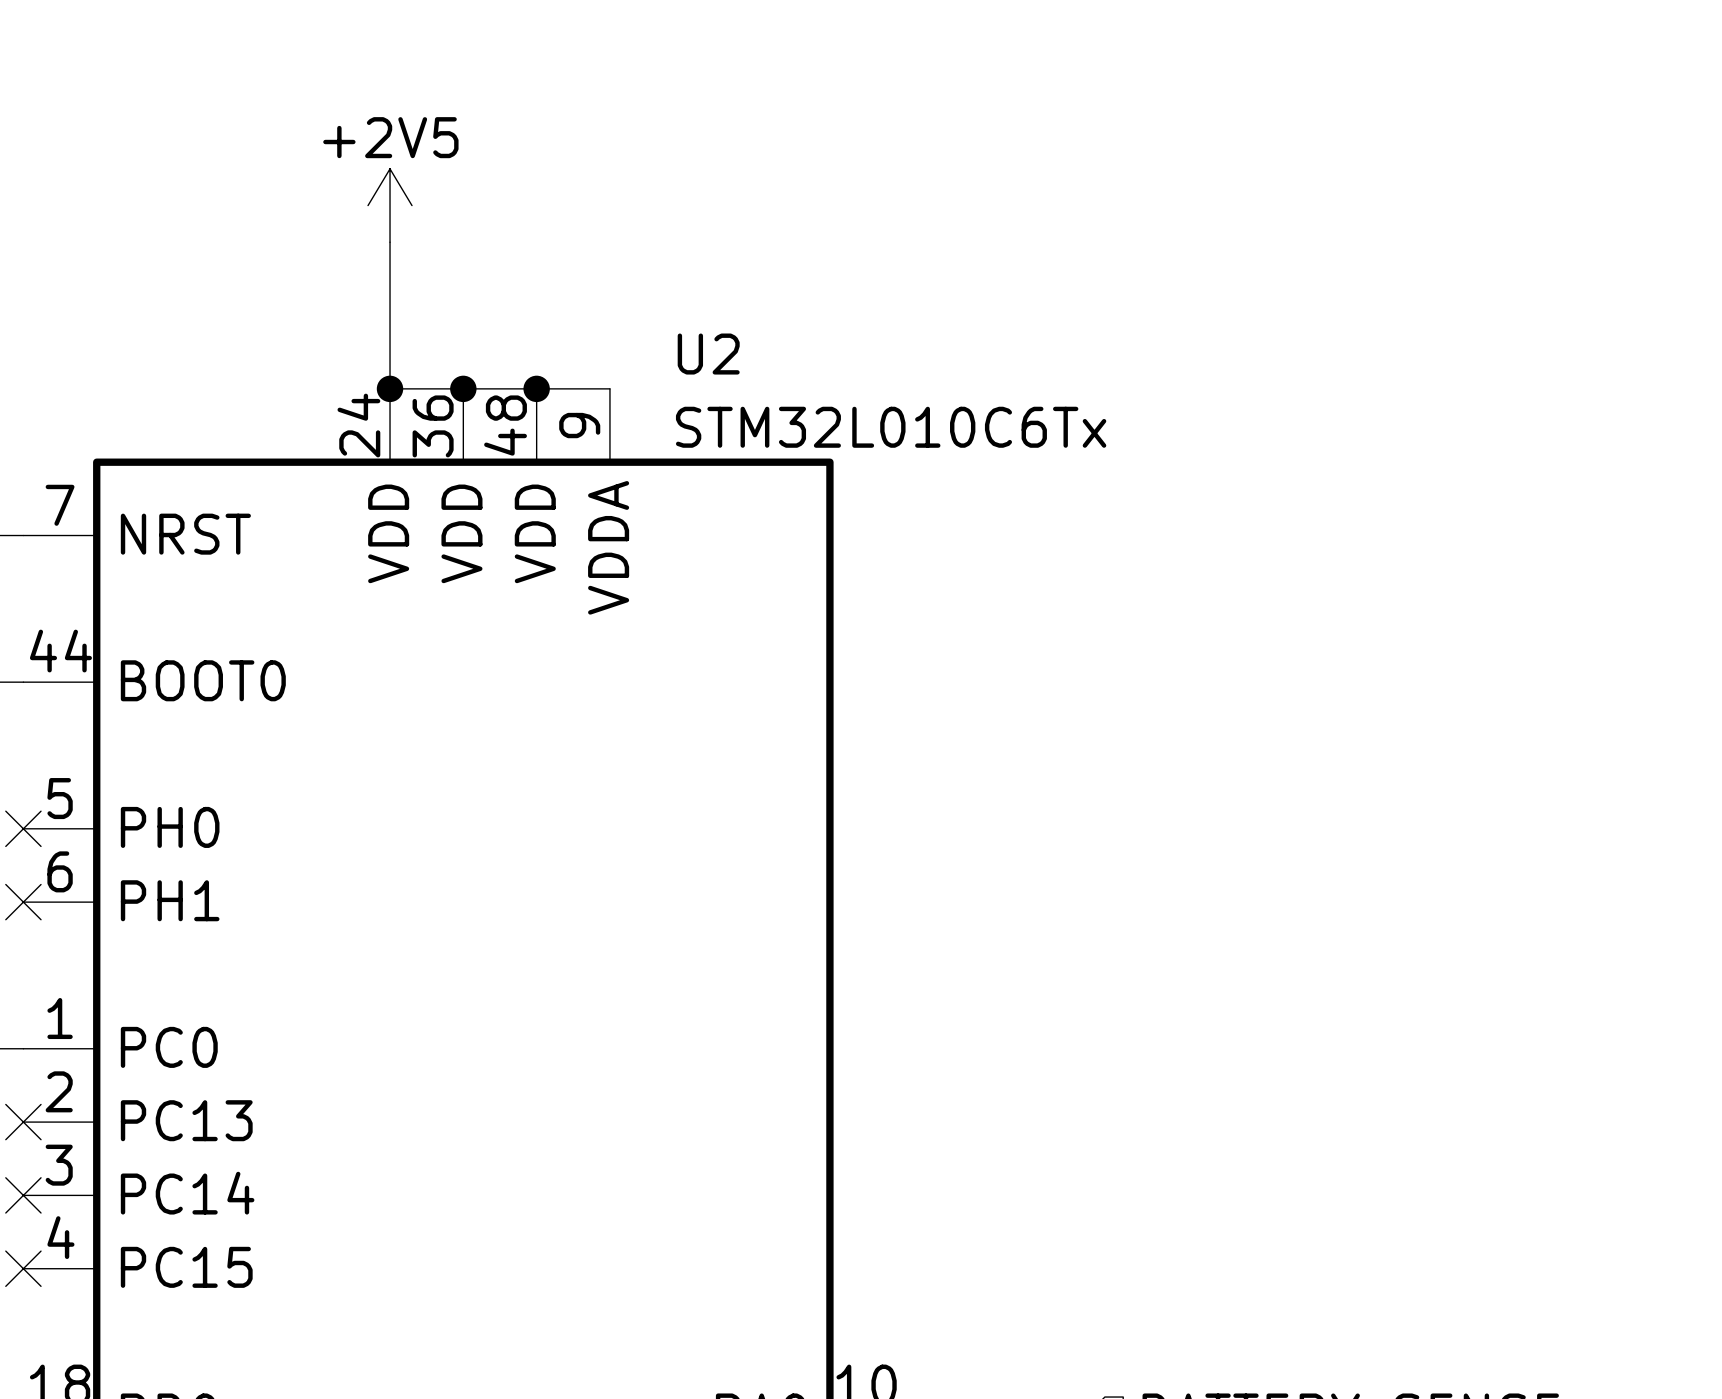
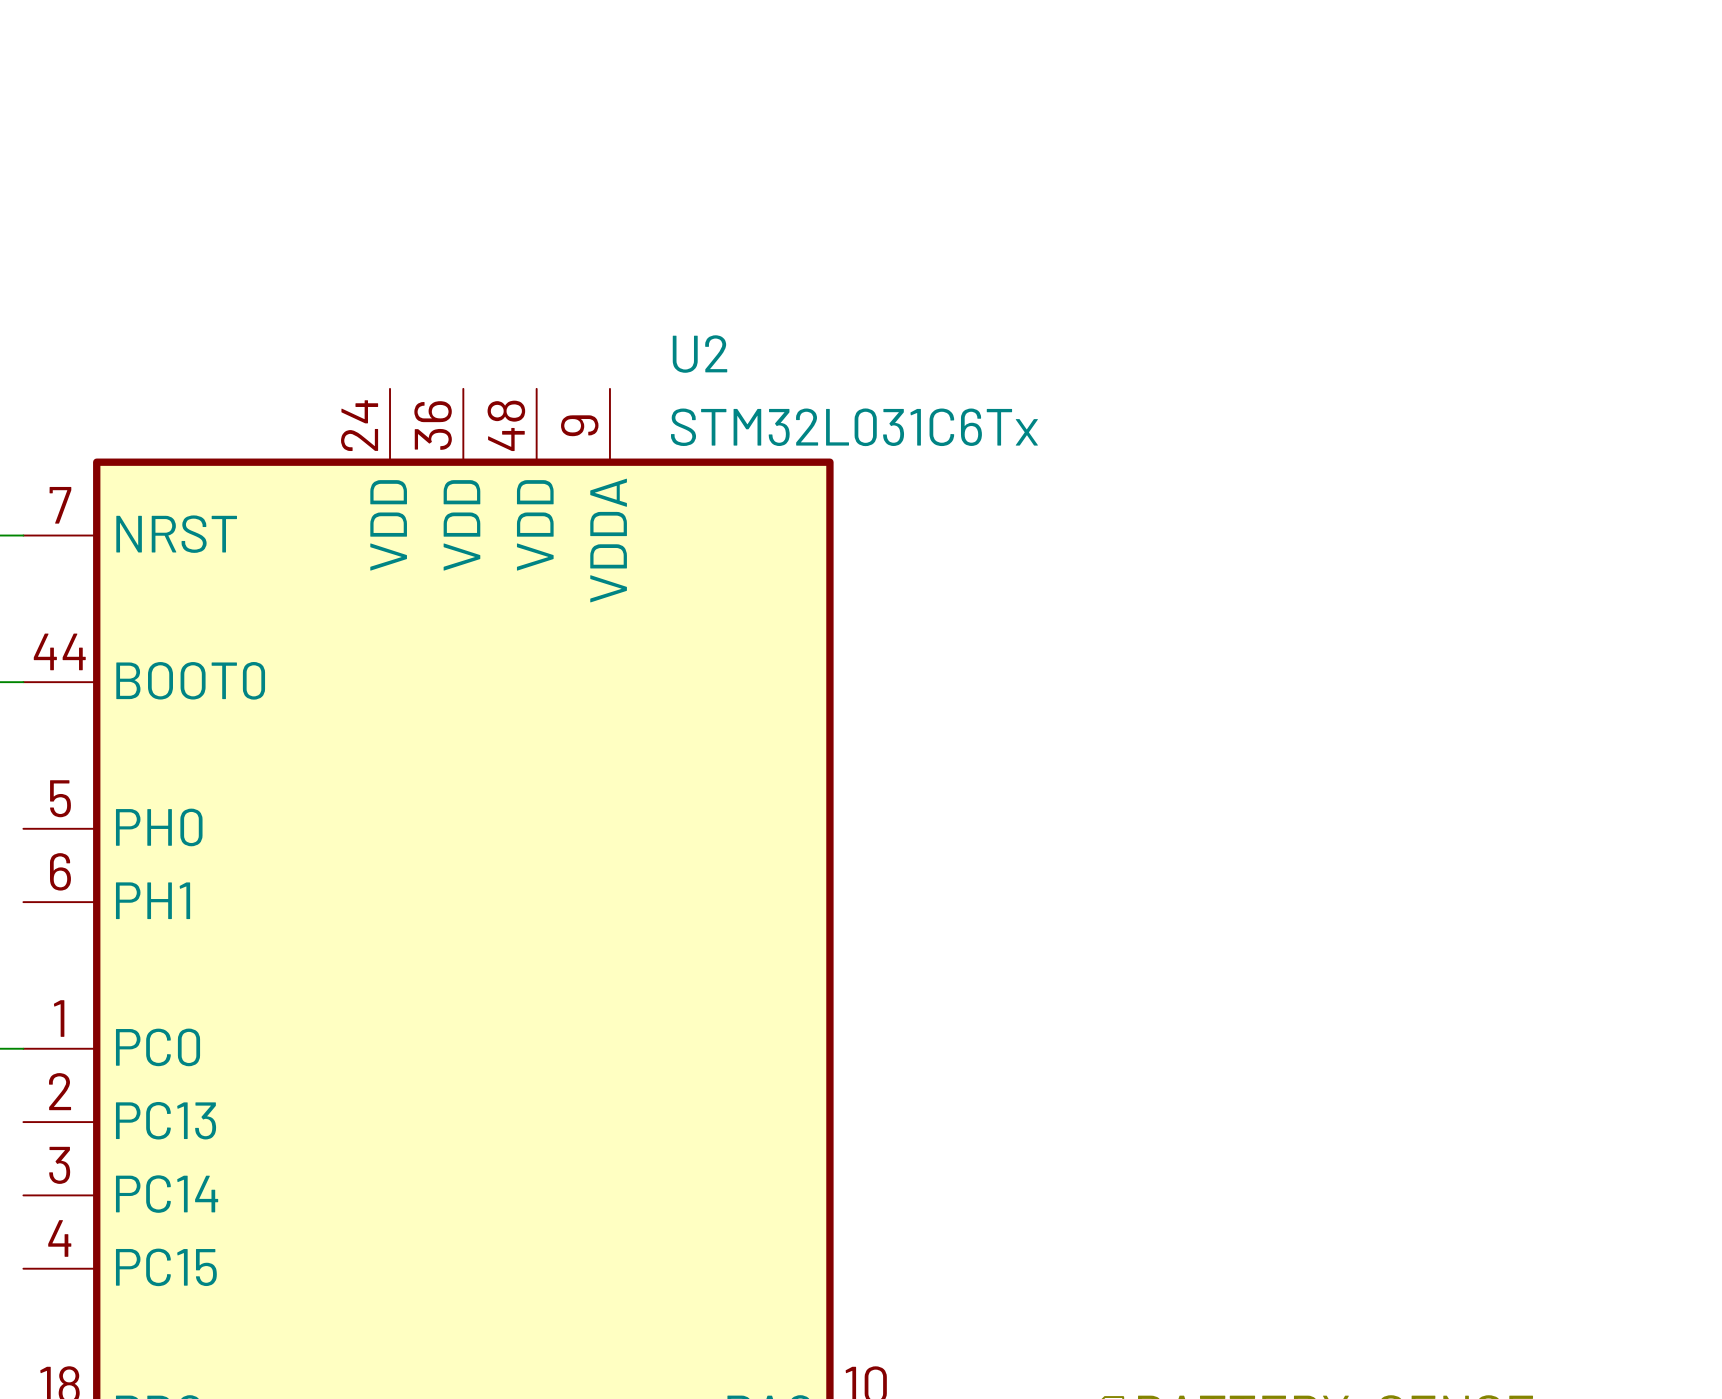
power symbol: +2V5 (390, 205) -> none
wire: (390, 242) (390, 388) (609, 388) -> none
junction: (390, 388) -> none
junction: (463, 388) -> none
junction: (536, 388) -> none
U2 value: STM32L010C6Tx (891, 427) -> STM32L031C6Tx (854, 427)
no-connect mark: (23, 828) -> none
no-connect mark: (23, 902) -> none
no-connect mark: (23, 1122) -> none
no-connect mark: (23, 1195) -> none
no-connect mark: (23, 1268) -> none

